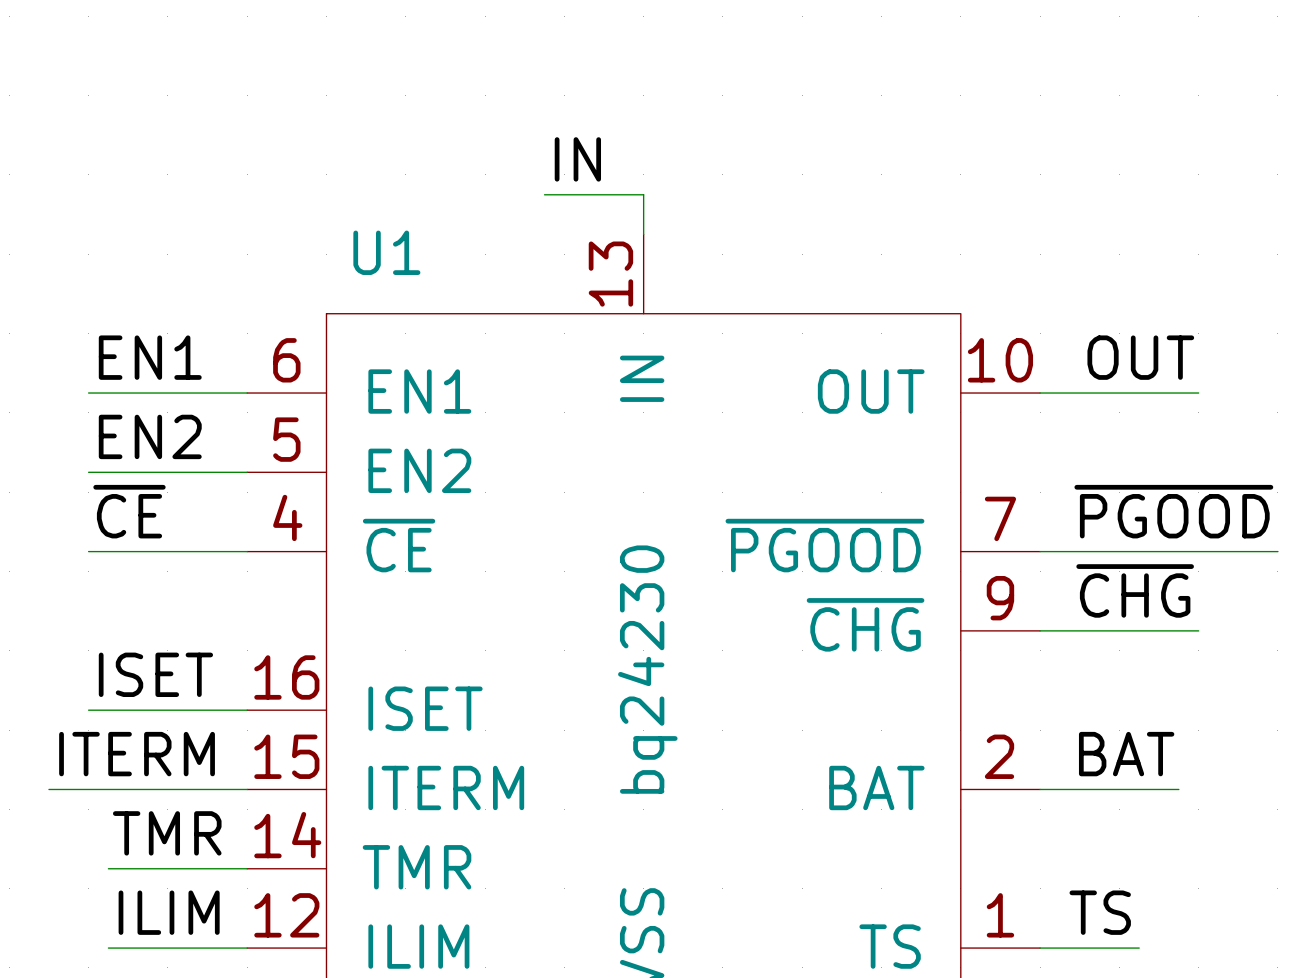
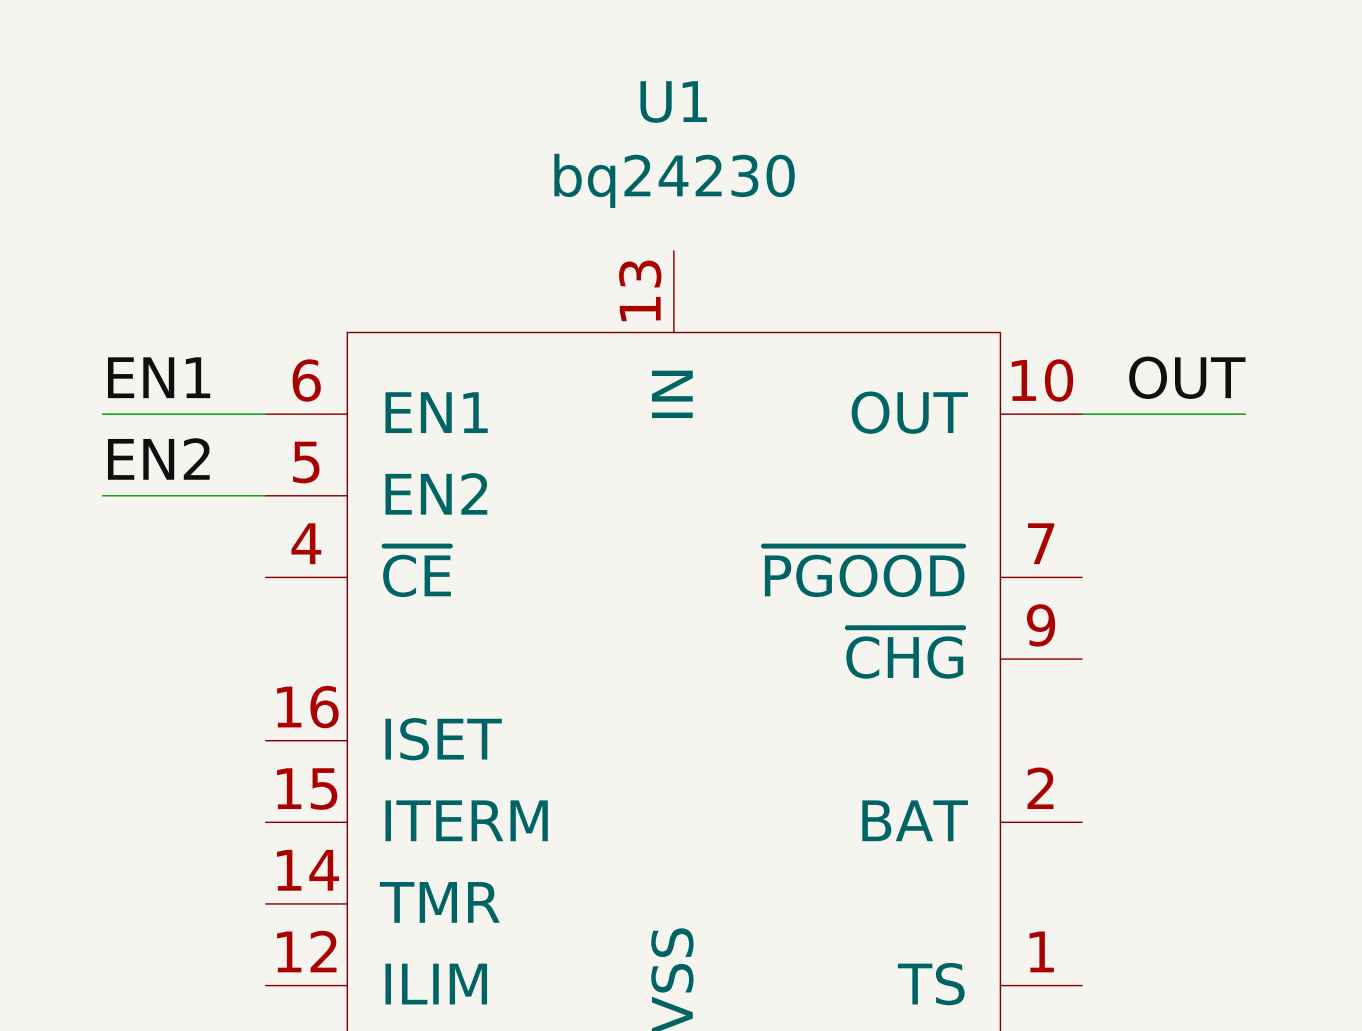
label: IN (577, 159) -> none
wire: (544, 194) (643, 194) (643, 234) -> none
U1 name position: U1 (386, 252) -> U1 (673, 102)
label: ~{CE} (129, 511) -> none
label: ~{PGOOD} (1173, 511) -> none
wire: (88, 551) (247, 551) -> none
wire: (1040, 551) (1277, 551) -> none
label: ~{CHG} (1135, 590) -> none
wire: (1040, 630) (1198, 630) -> none
U1 value rotation: 0° (647, 669) -> 90° clockwise (674, 180)
U1 value position: bq24230 (647, 669) -> bq24230 (674, 180)
label: ISET (155, 674) -> none
wire: (88, 710) (247, 710) -> none
label: ITERM (137, 754) -> none
label: BAT (1126, 754) -> none
wire: (48, 789) (247, 789) -> none
wire: (1040, 789) (1178, 789) -> none
label: TMR (167, 833) -> none
wire: (108, 868) (247, 868) -> none
label: ILIM (169, 912) -> none
label: TS (1100, 912) -> none
wire: (108, 948) (247, 948) -> none
wire: (1040, 948) (1139, 948) -> none

